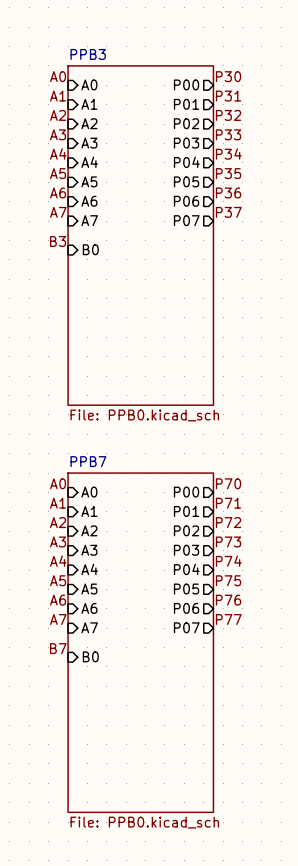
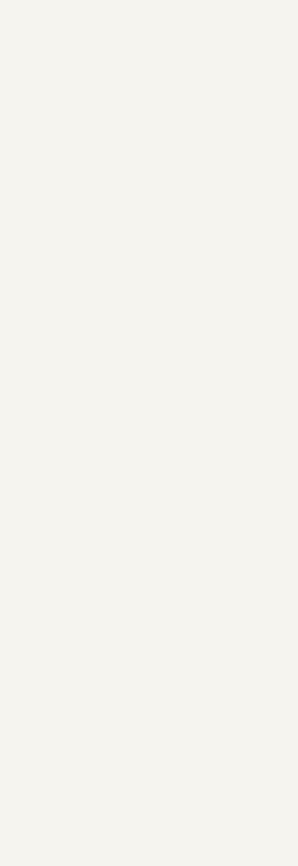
label: A0 (58, 76) -> none
label: P30 (228, 76) -> none
sheet pin: A0 (89, 84) -> none
sheet pin: P00 (186, 84) -> none
label: A1 (58, 96) -> none
label: P31 (228, 96) -> none
sheet pin: A1 (89, 104) -> none
sheet pin: P01 (186, 104) -> none
label: A2 (58, 115) -> none
label: P32 (228, 115) -> none
sheet pin: A2 (89, 123) -> none
sheet pin: P02 (186, 123) -> none
label: A3 (58, 134) -> none
label: P33 (228, 134) -> none
sheet pin: A3 (89, 143) -> none
sheet pin: P03 (186, 143) -> none
label: A4 (58, 153) -> none
label: P34 (228, 153) -> none
sheet pin: A4 (89, 162) -> none
sheet pin: P04 (186, 162) -> none
label: A5 (58, 173) -> none
label: P35 (228, 173) -> none
sheet pin: A5 (89, 181) -> none
sheet pin: P05 (186, 181) -> none
label: A6 (58, 192) -> none
label: P36 (228, 192) -> none
sheet pin: A6 (89, 201) -> none
sheet pin: P06 (186, 201) -> none
label: A7 (58, 212) -> none
label: P37 (228, 212) -> none
sheet pin: A7 (89, 220) -> none
sheet pin: P07 (186, 220) -> none
sheet PPB3: File: PPB0.kicad_sch (140, 235) -> none
label: B3 (58, 241) -> none
sheet pin: B0 (90, 249) -> none
label: A0 (58, 483) -> none
label: P70 (228, 483) -> none
sheet pin: A0 (89, 492) -> none
sheet pin: P00 (186, 492) -> none
label: A1 (58, 503) -> none
label: P71 (228, 503) -> none
sheet pin: A1 (89, 511) -> none
sheet pin: P01 (186, 511) -> none
label: A2 (58, 522) -> none
label: P72 (228, 522) -> none
sheet pin: A2 (89, 530) -> none
sheet pin: P02 (186, 530) -> none
label: A3 (58, 541) -> none
label: P73 (228, 541) -> none
sheet pin: A3 (89, 550) -> none
sheet pin: P03 (186, 550) -> none
label: A4 (58, 561) -> none
label: P74 (228, 561) -> none
sheet pin: A4 (89, 569) -> none
sheet pin: P04 (186, 569) -> none
label: A5 (58, 580) -> none
label: P75 (228, 580) -> none
sheet pin: A5 (89, 589) -> none
sheet pin: P05 (186, 589) -> none
label: A6 (58, 600) -> none
label: P76 (228, 600) -> none
sheet pin: A6 (89, 608) -> none
sheet pin: P06 (186, 608) -> none
label: A7 (58, 619) -> none
label: P77 (228, 619) -> none
sheet pin: A7 (89, 627) -> none
sheet pin: P07 (186, 627) -> none
sheet PPB7: File: PPB0.kicad_sch (140, 642) -> none
label: B7 (58, 648) -> none
sheet pin: B0 (90, 656) -> none

